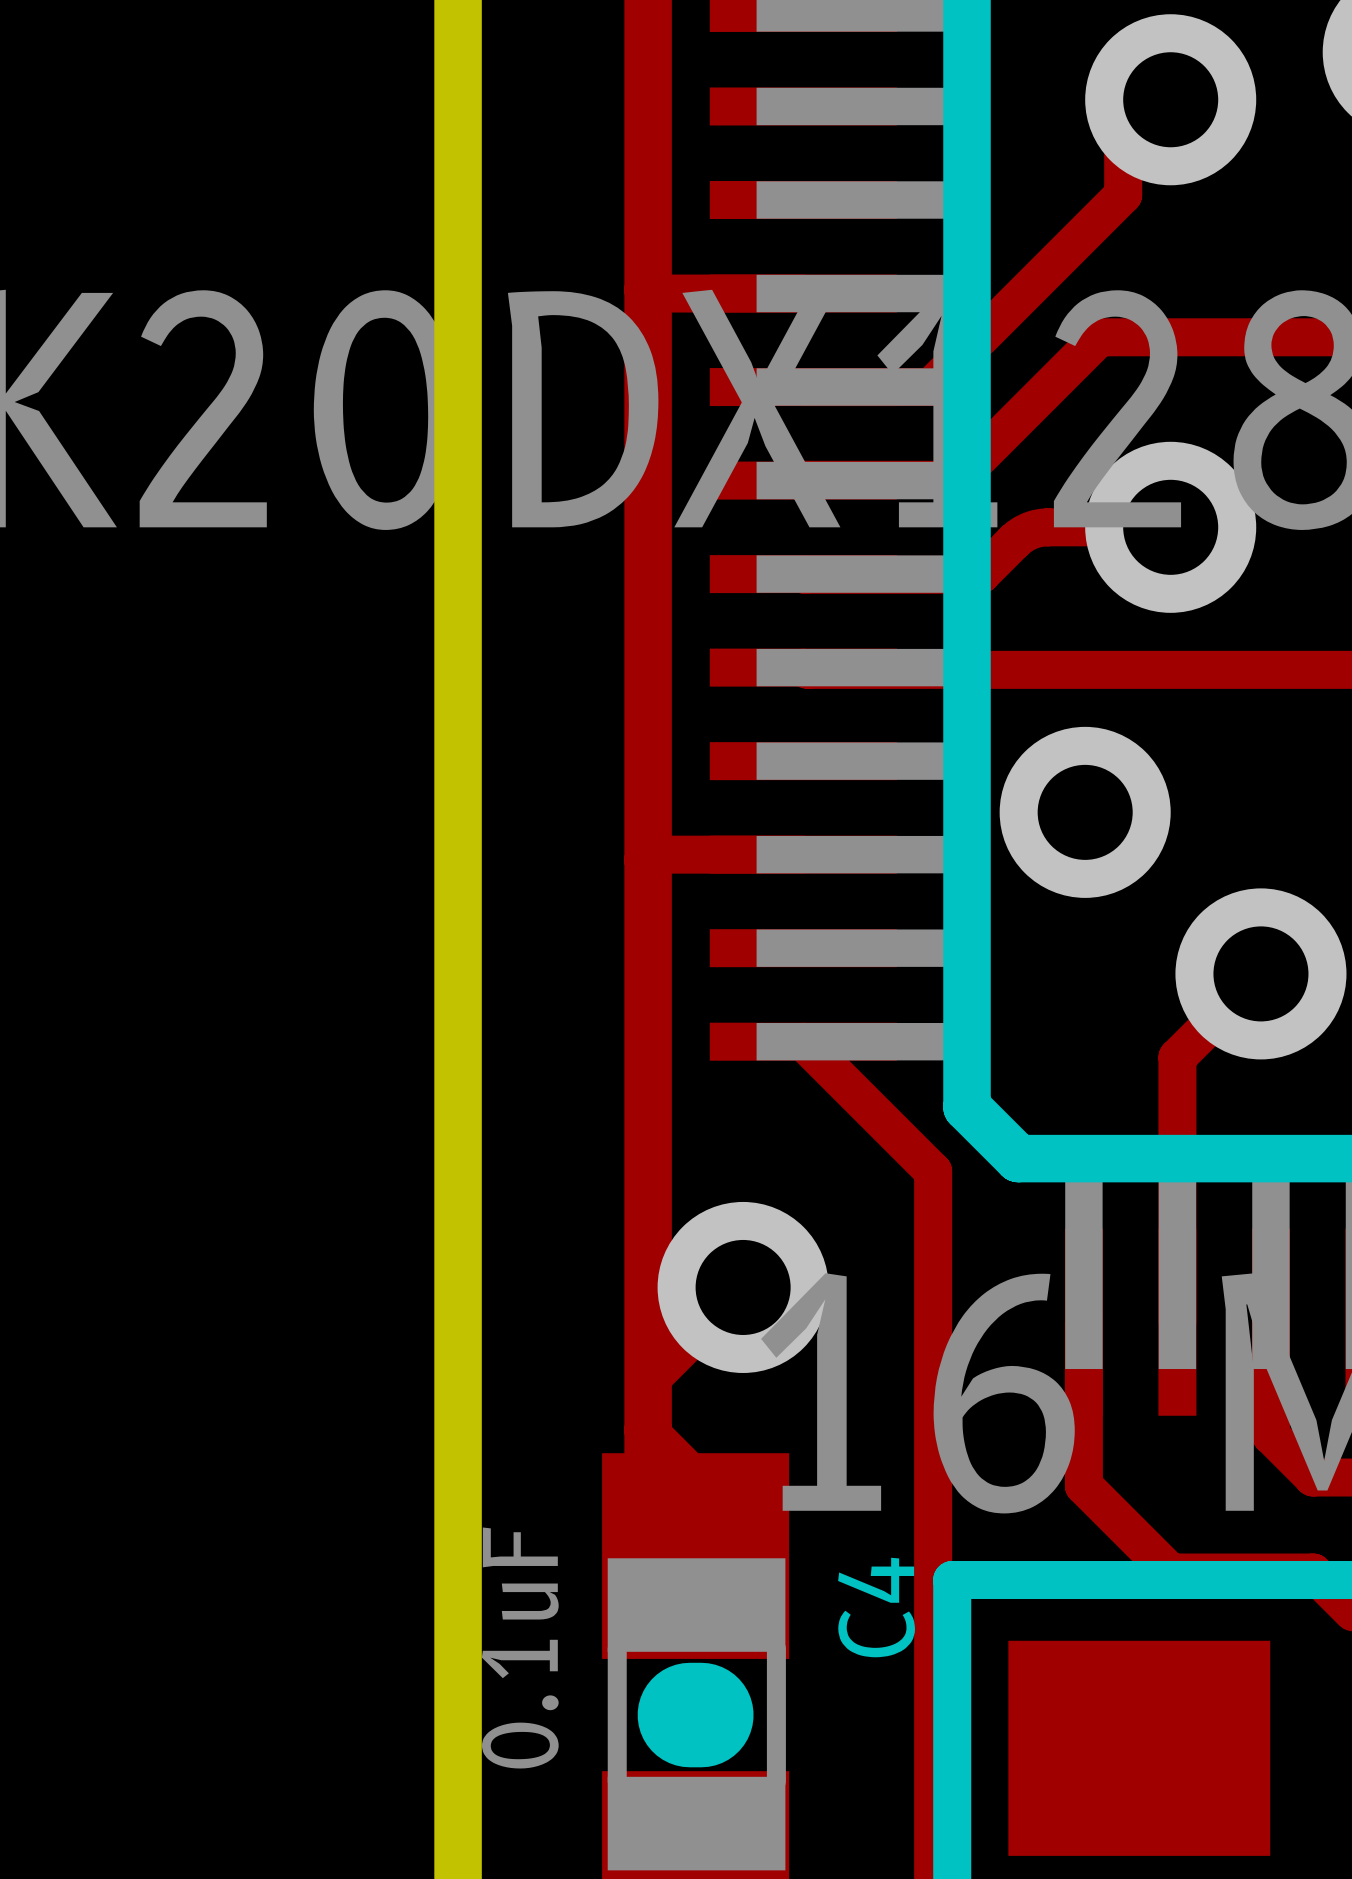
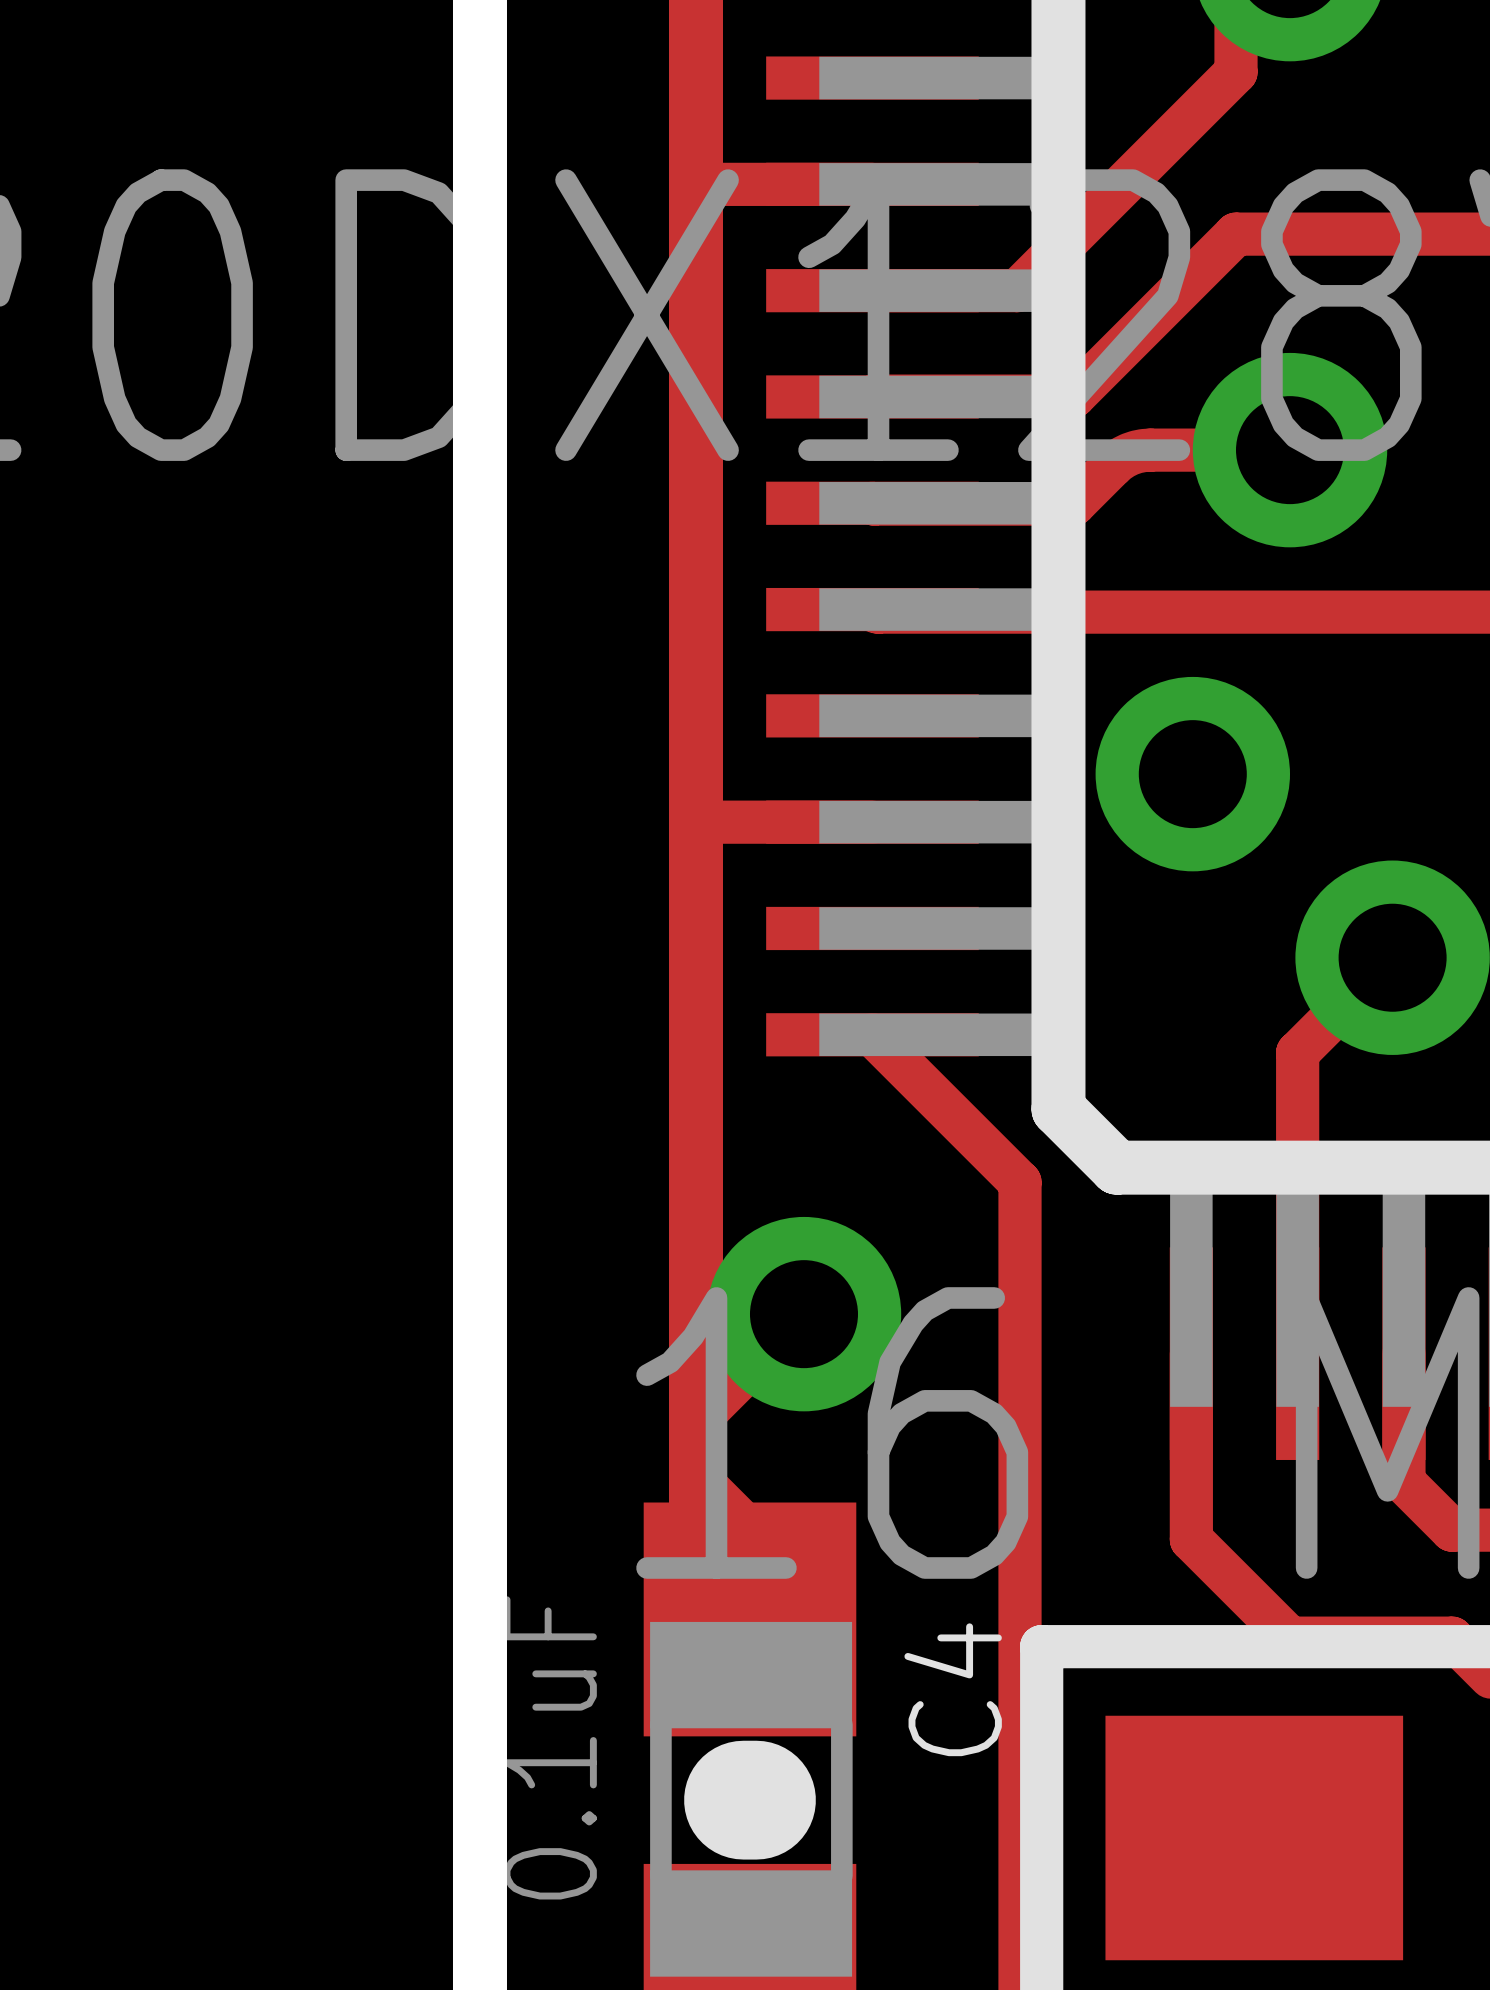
track: (1123, 337) (1099, 337) (956, 479) -> (1236, 234) (1074, 396) (1047, 396)

